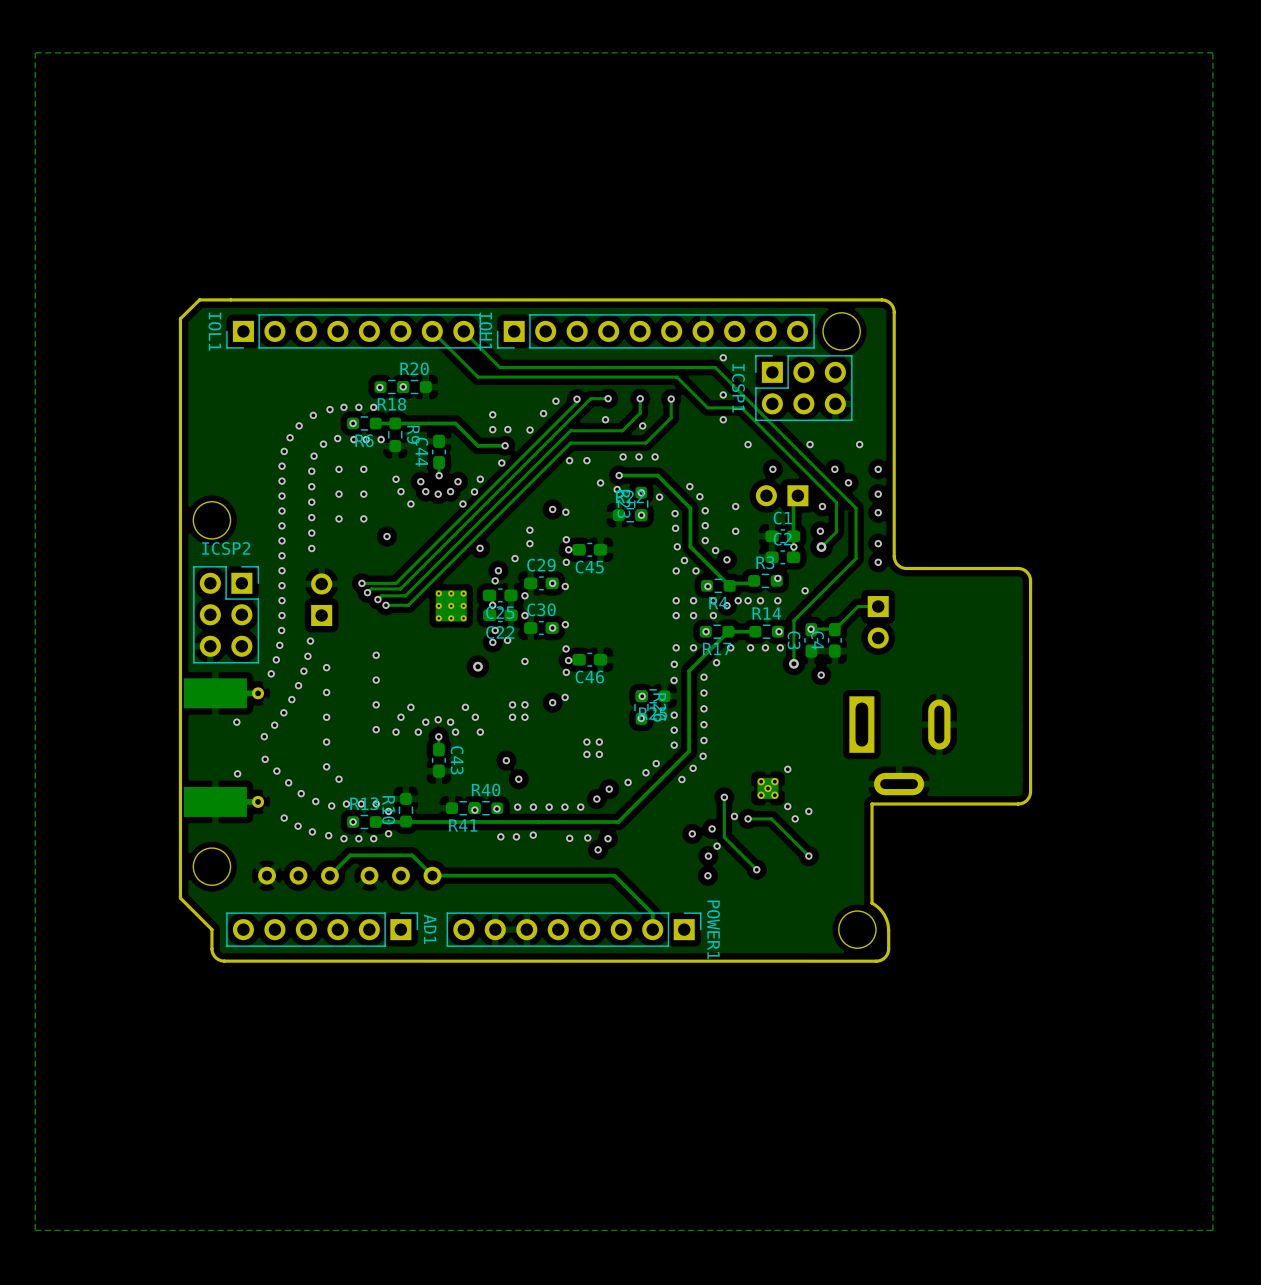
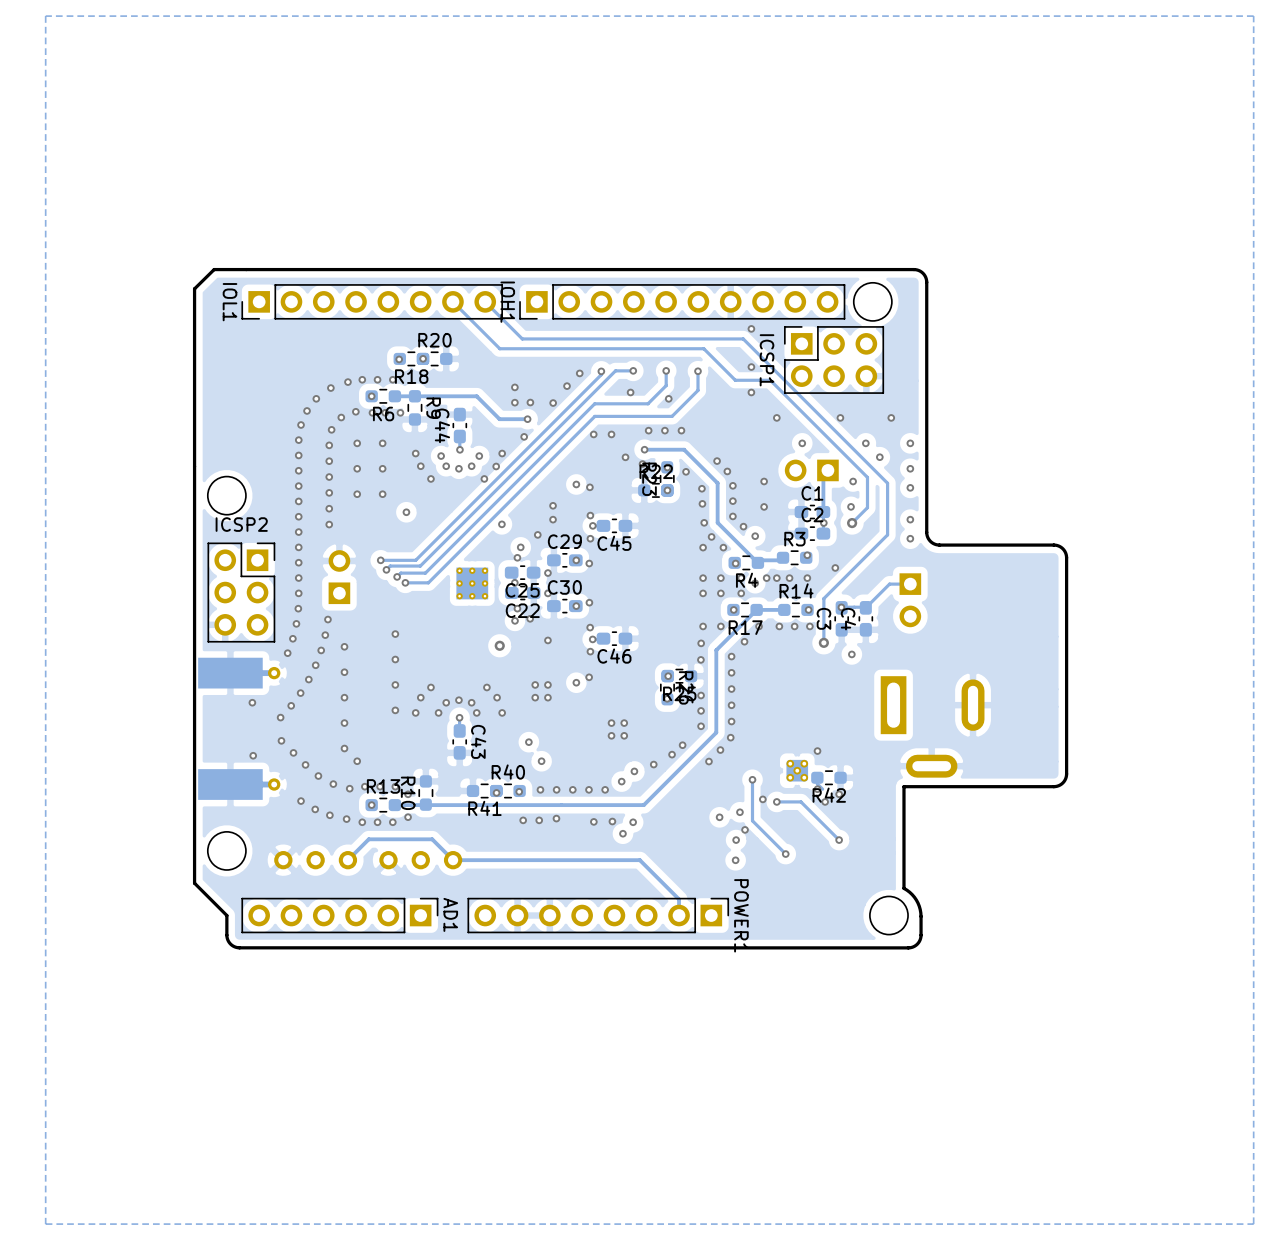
track: none -> (817, 777) (817, 783) (822, 789)
R42: none -> (828, 777)

